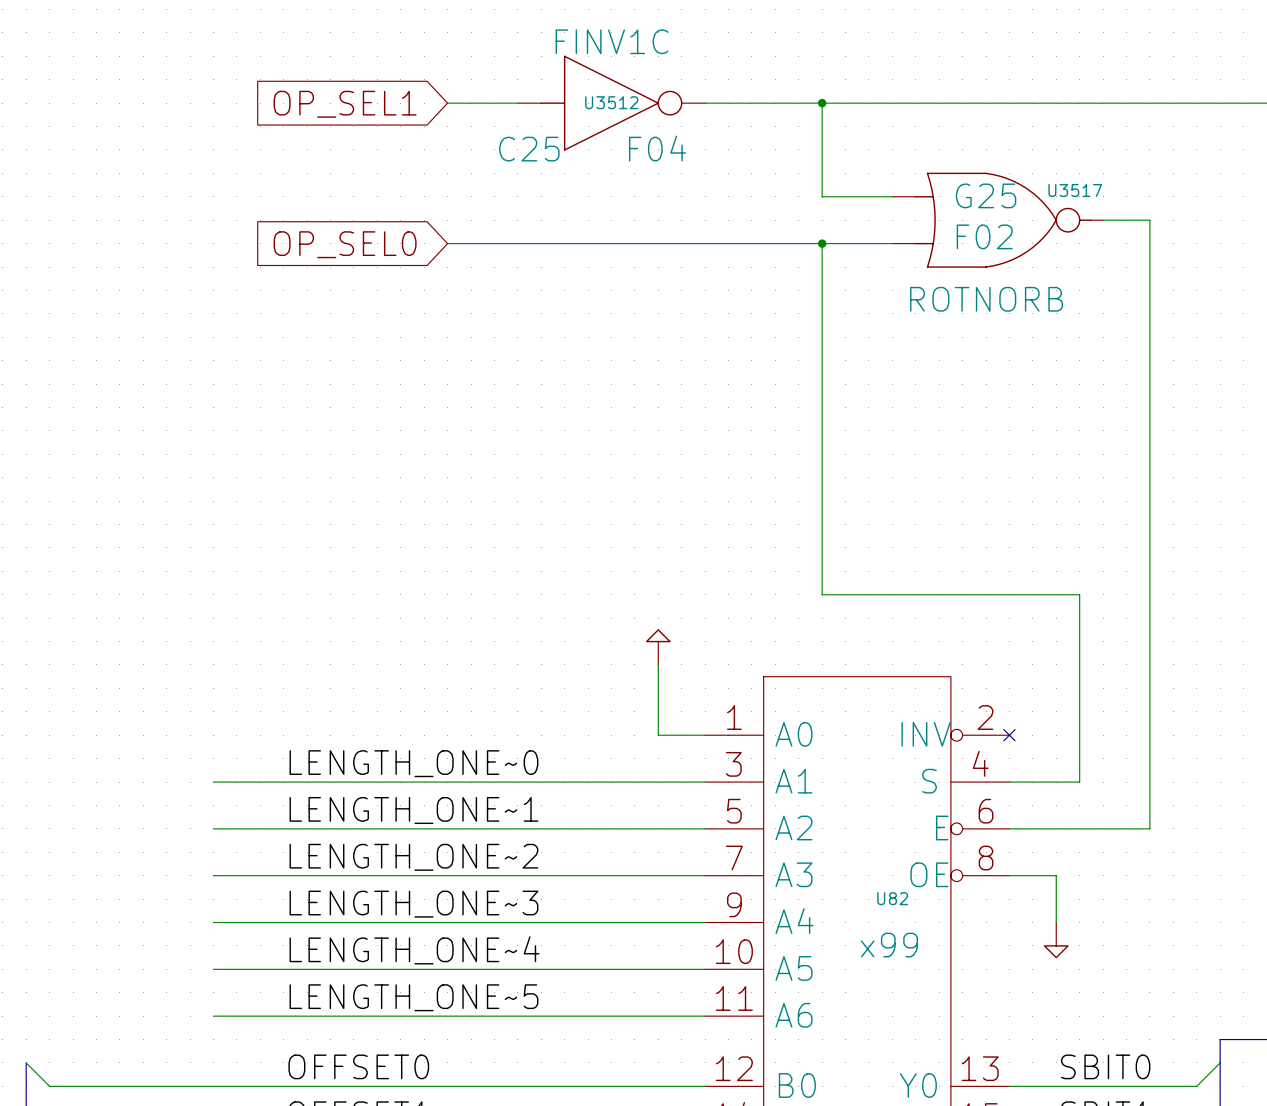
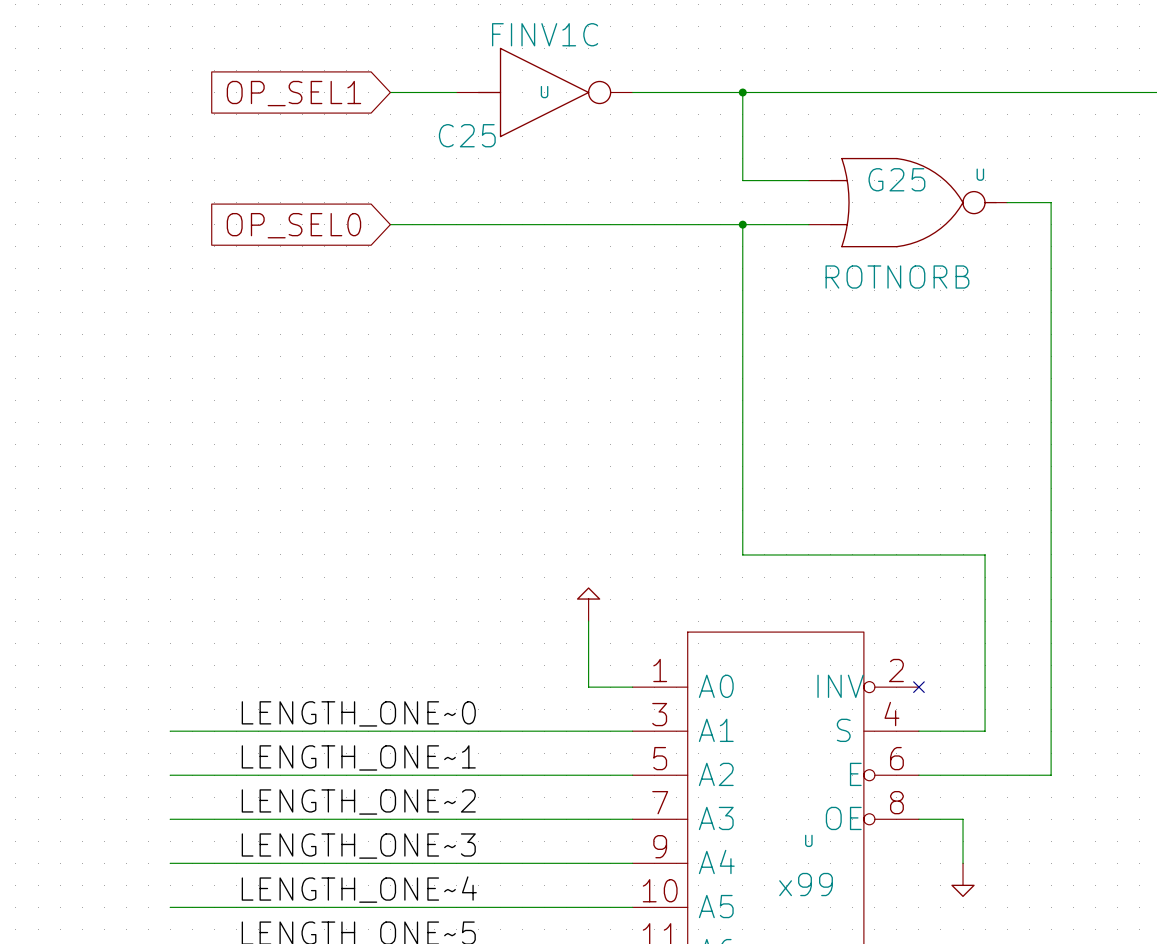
U3512 name: U3512 (611, 102) -> U (544, 92)
U3512 value: F04 (657, 148) -> none
U3517 name: U3517 (1075, 190) -> U (980, 174)
U3517 value: F02 (984, 236) -> none
U82 name: U82 (892, 898) -> U (808, 840)

